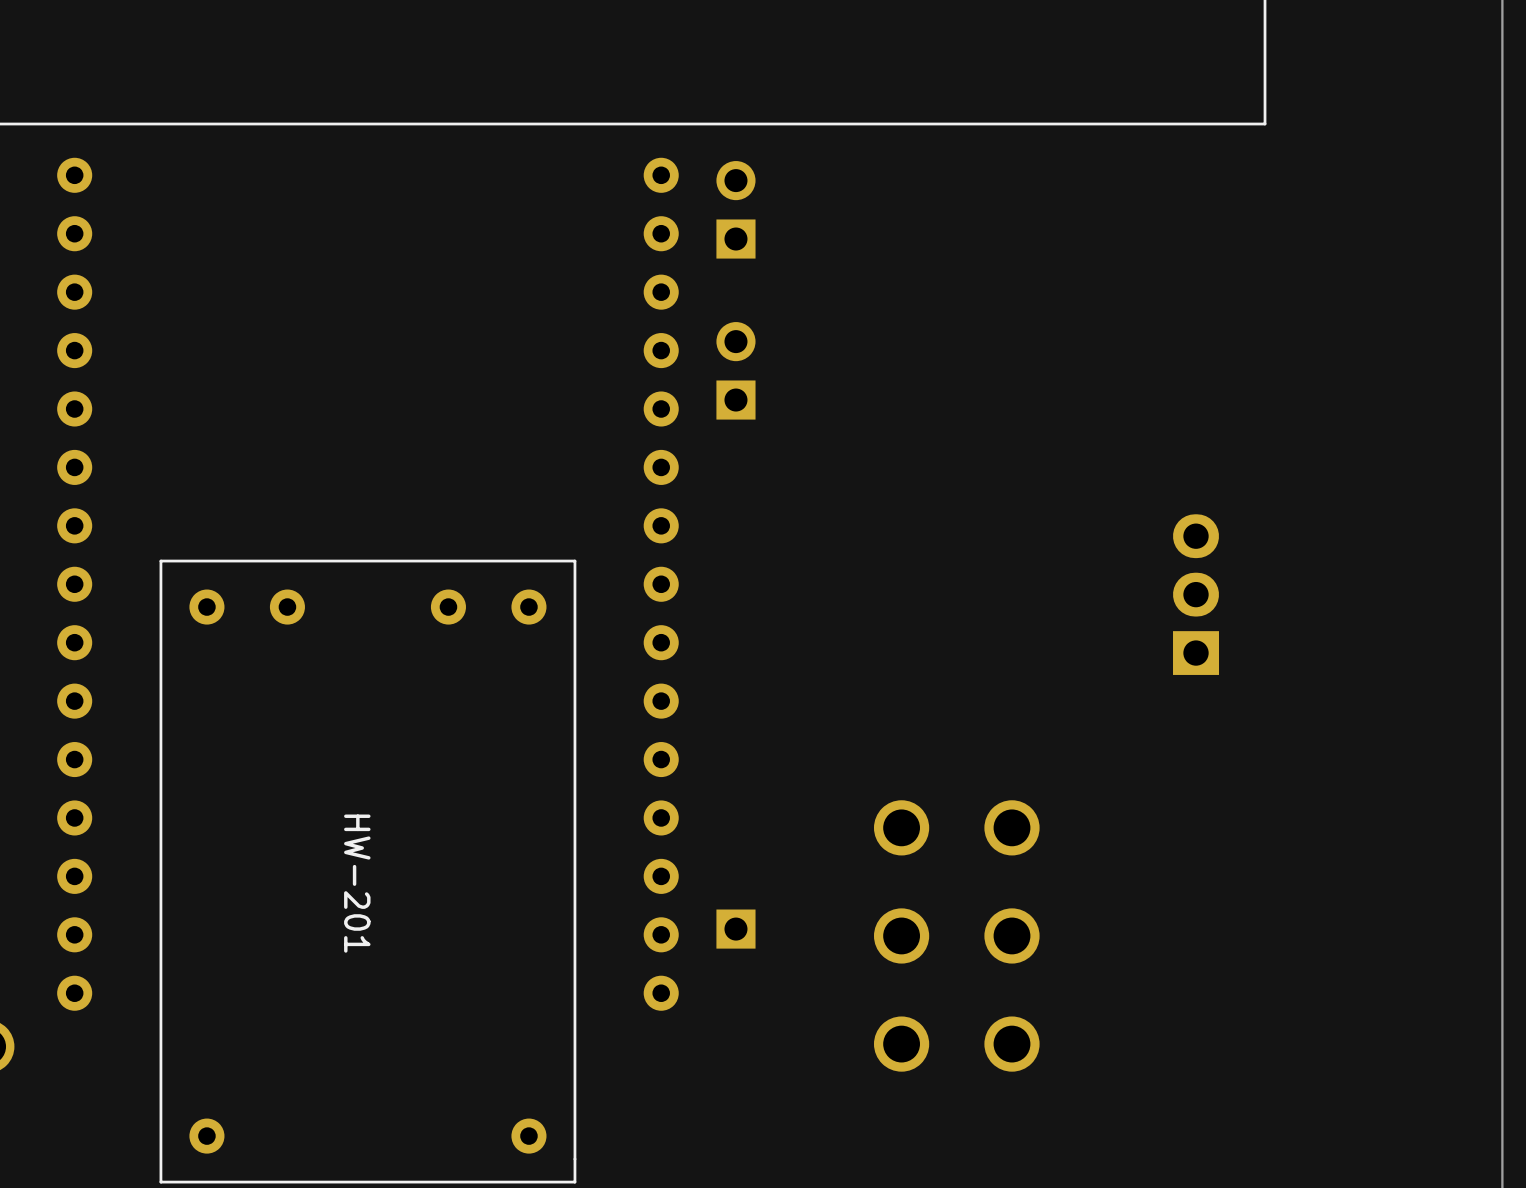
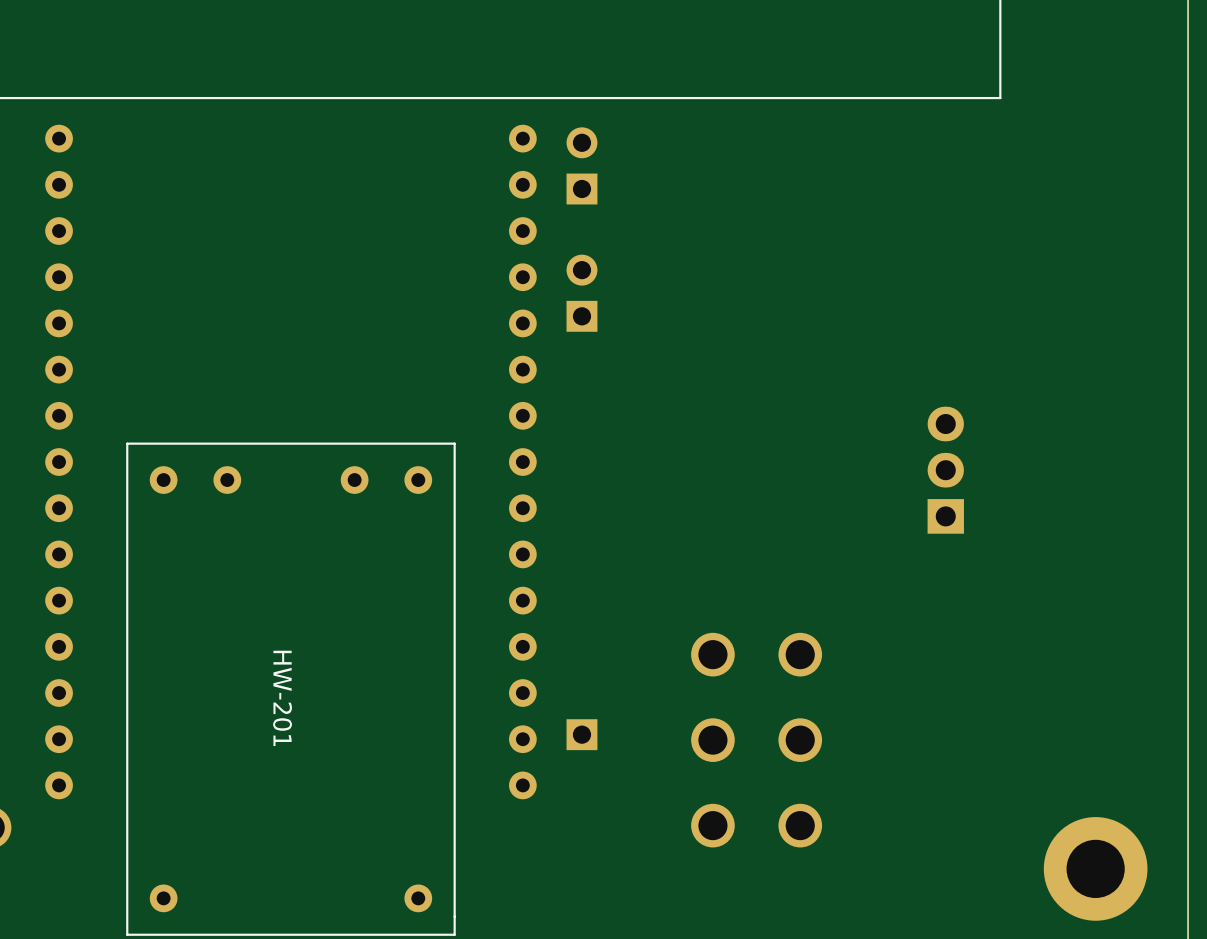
part: none -> (1095, 868)

